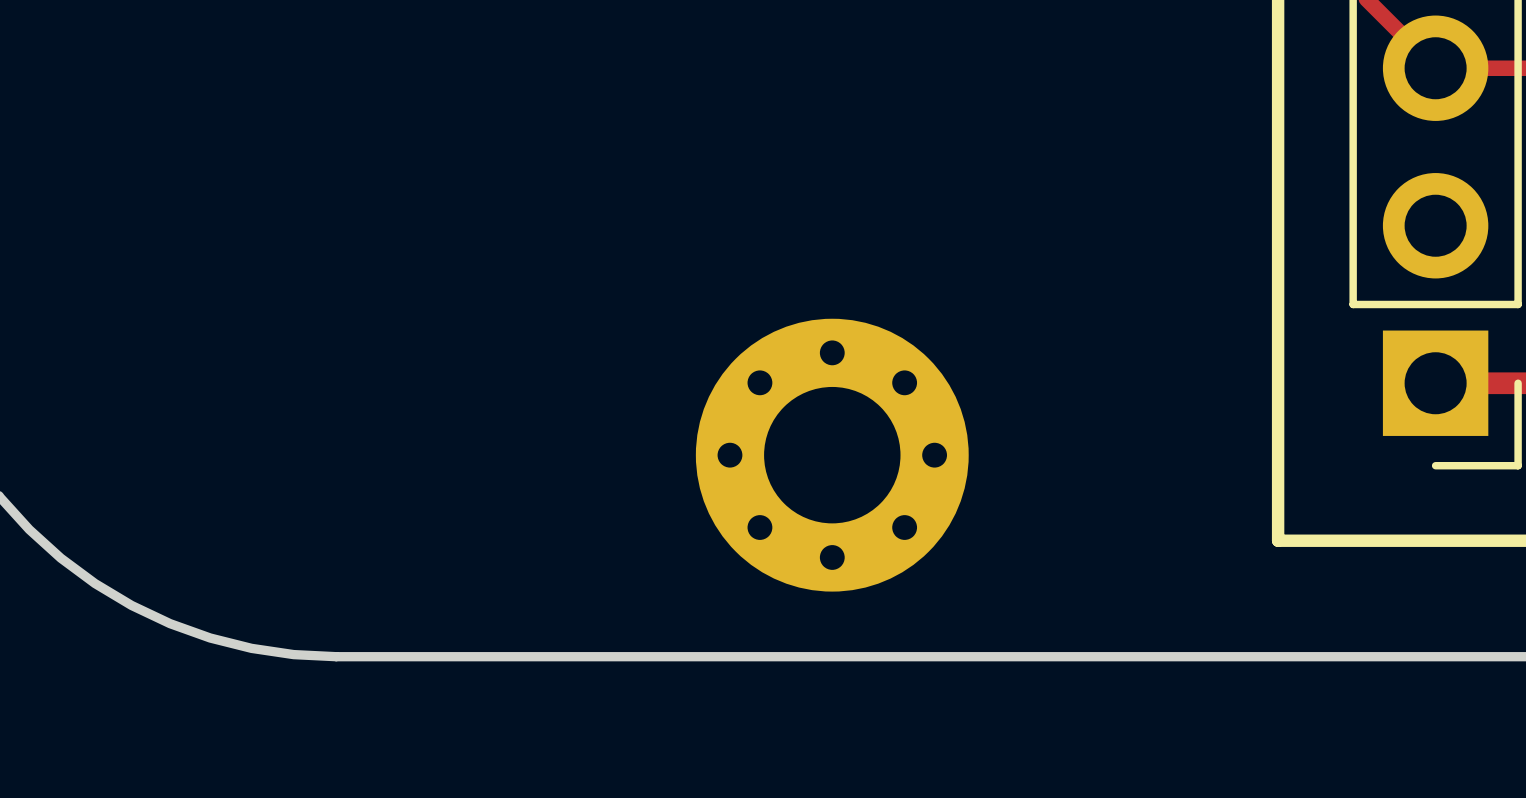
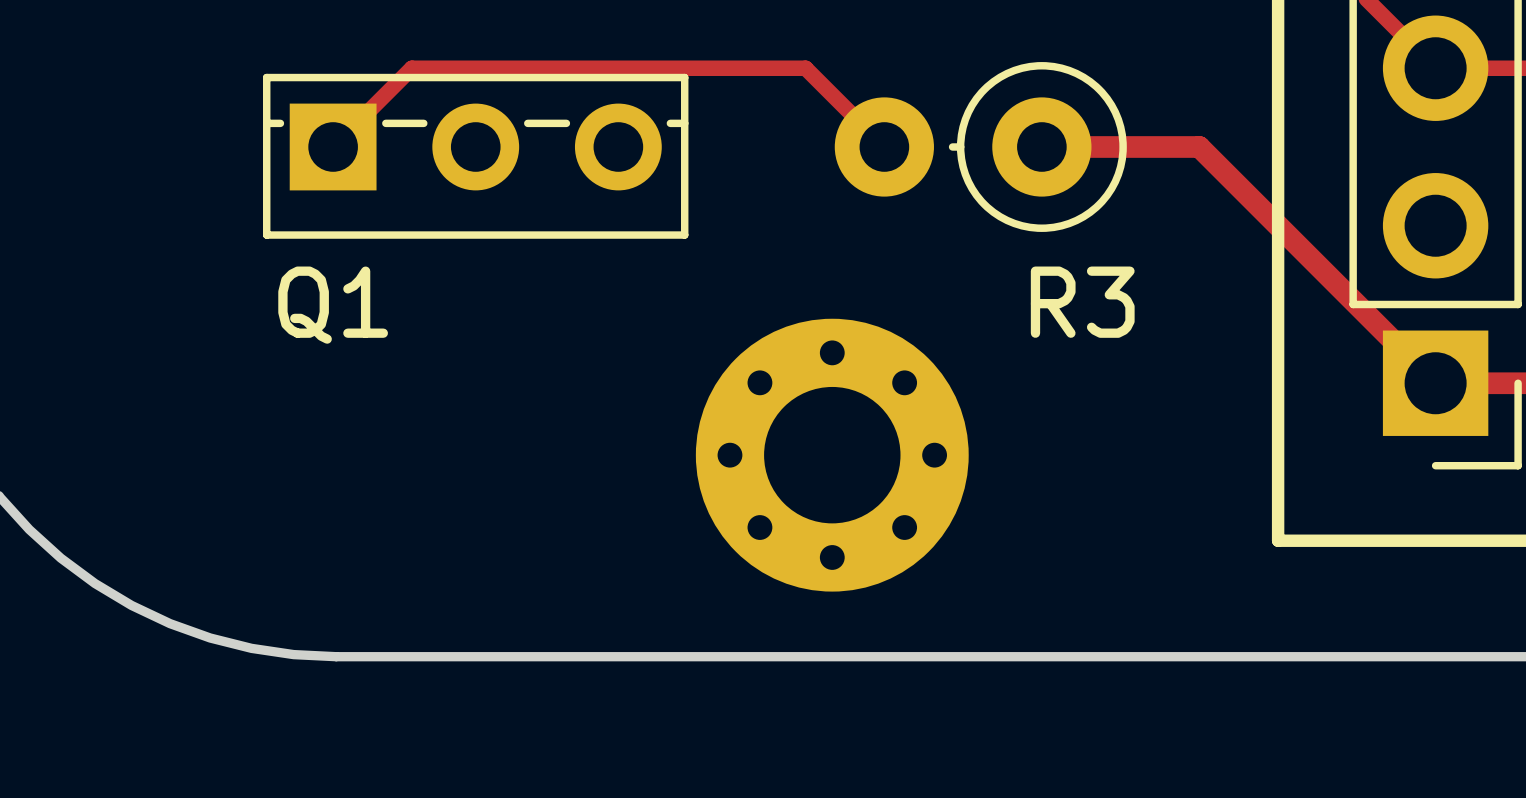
track: none -> (333, 146) (411, 68) (805, 68) (884, 146)
R3: none -> (980, 146)
track: none -> (1041, 146) (1199, 146) (1435, 383)
Q1: none -> (475, 156)

